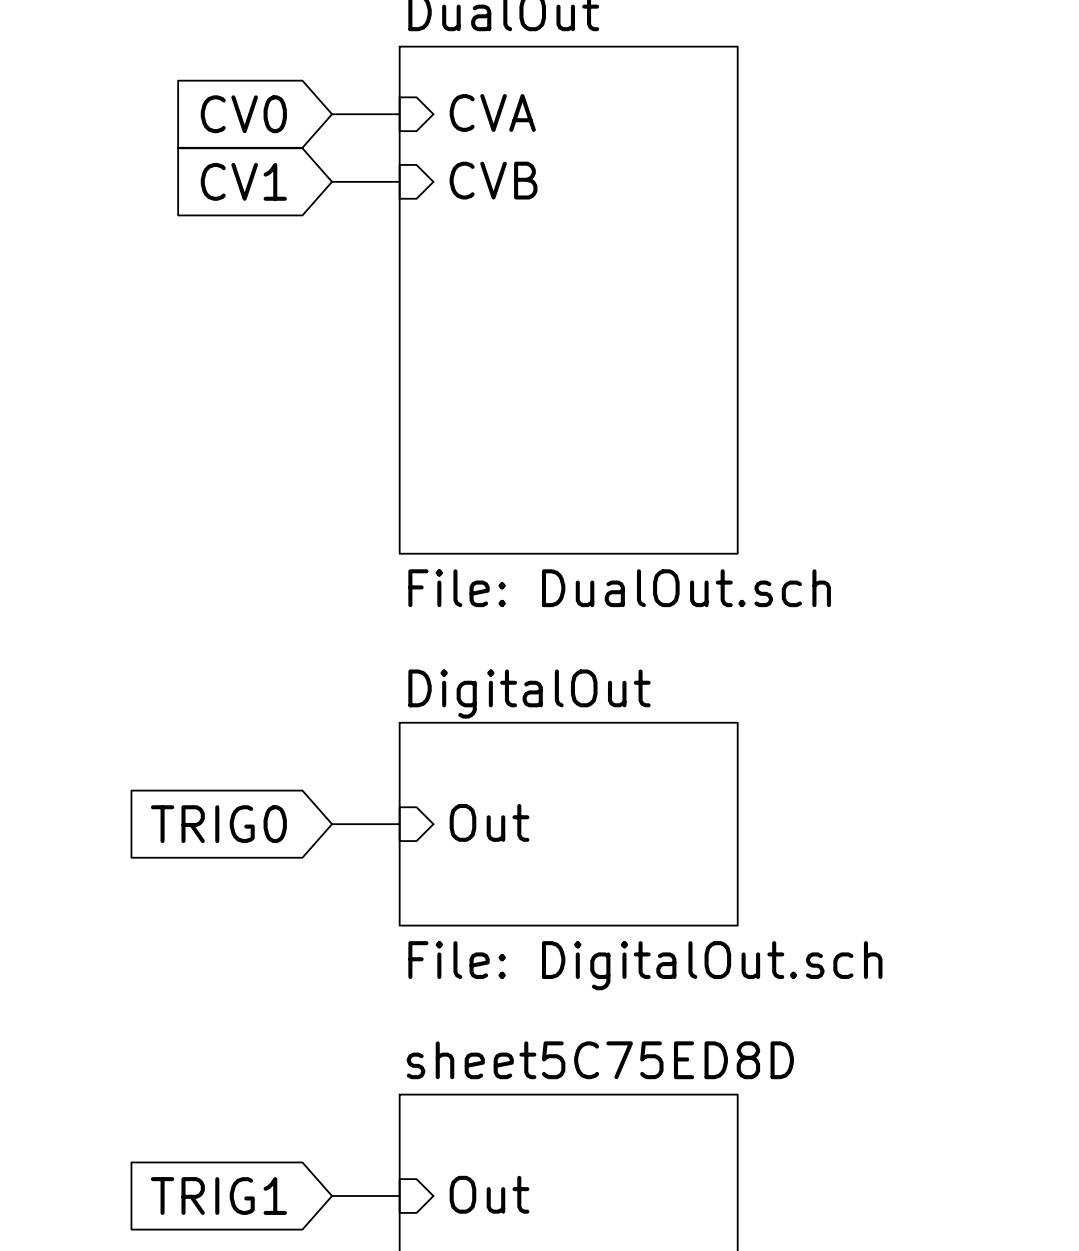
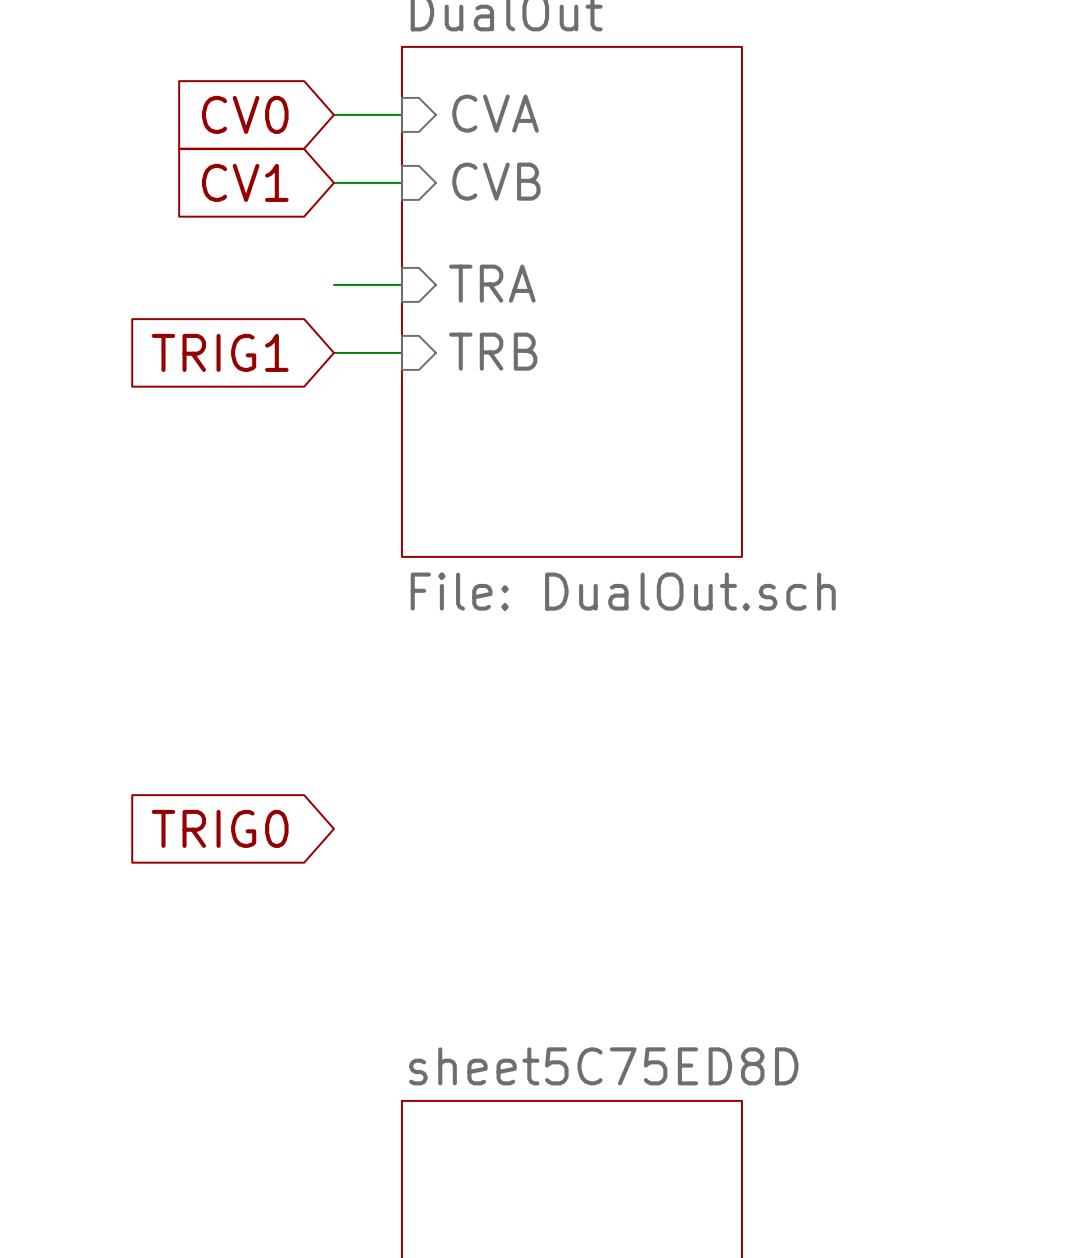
sheet pin: none -> TRA (492, 283)
wire: none -> (333, 284) (401, 284)
sheet pin: none -> TRB (493, 351)
global label: none -> TRIG1 (220, 352)
sheet pin: Out (489, 822) -> none
wire: (332, 824) (399, 824) -> (333, 352) (401, 352)
sheet DigitalOut: File: DigitalOut.sch (568, 824) -> none
sheet pin: Out (489, 1194) -> none
global label: TRIG1 (218, 1196) -> none
wire: (332, 1196) (399, 1196) -> none

